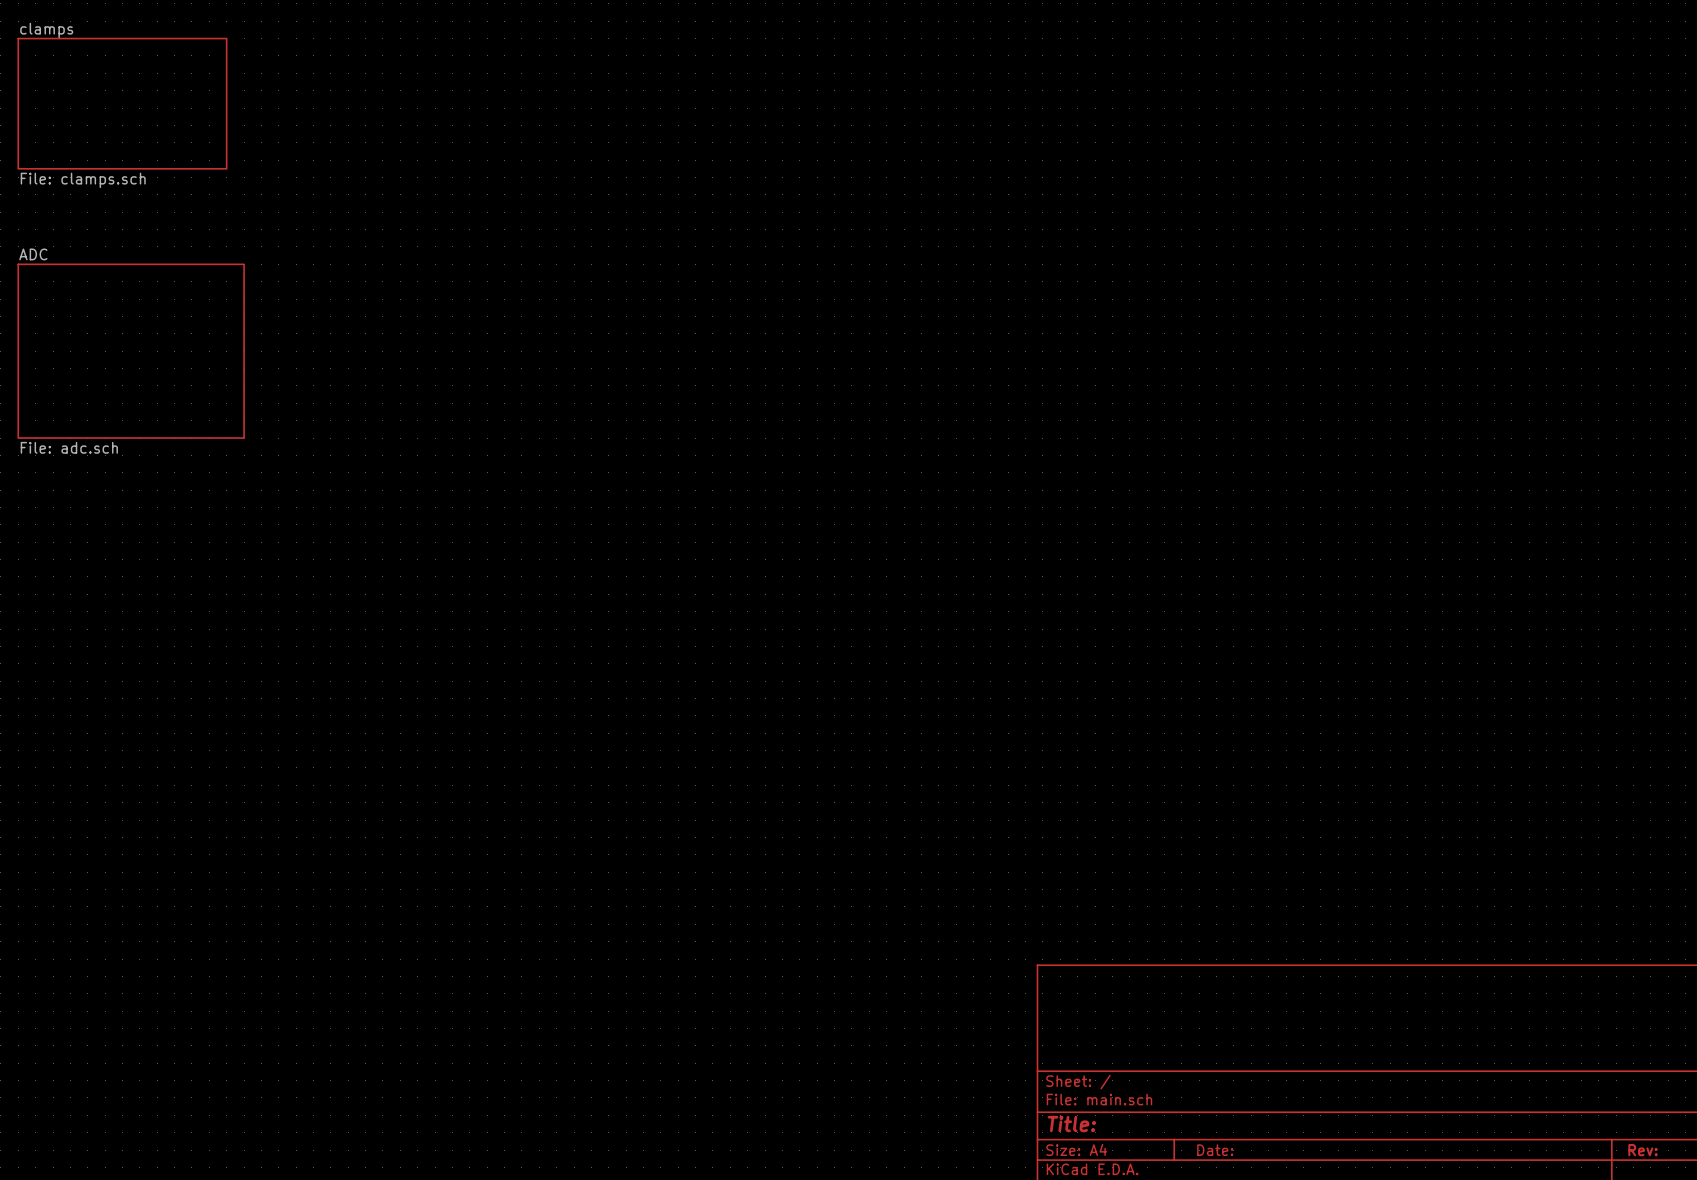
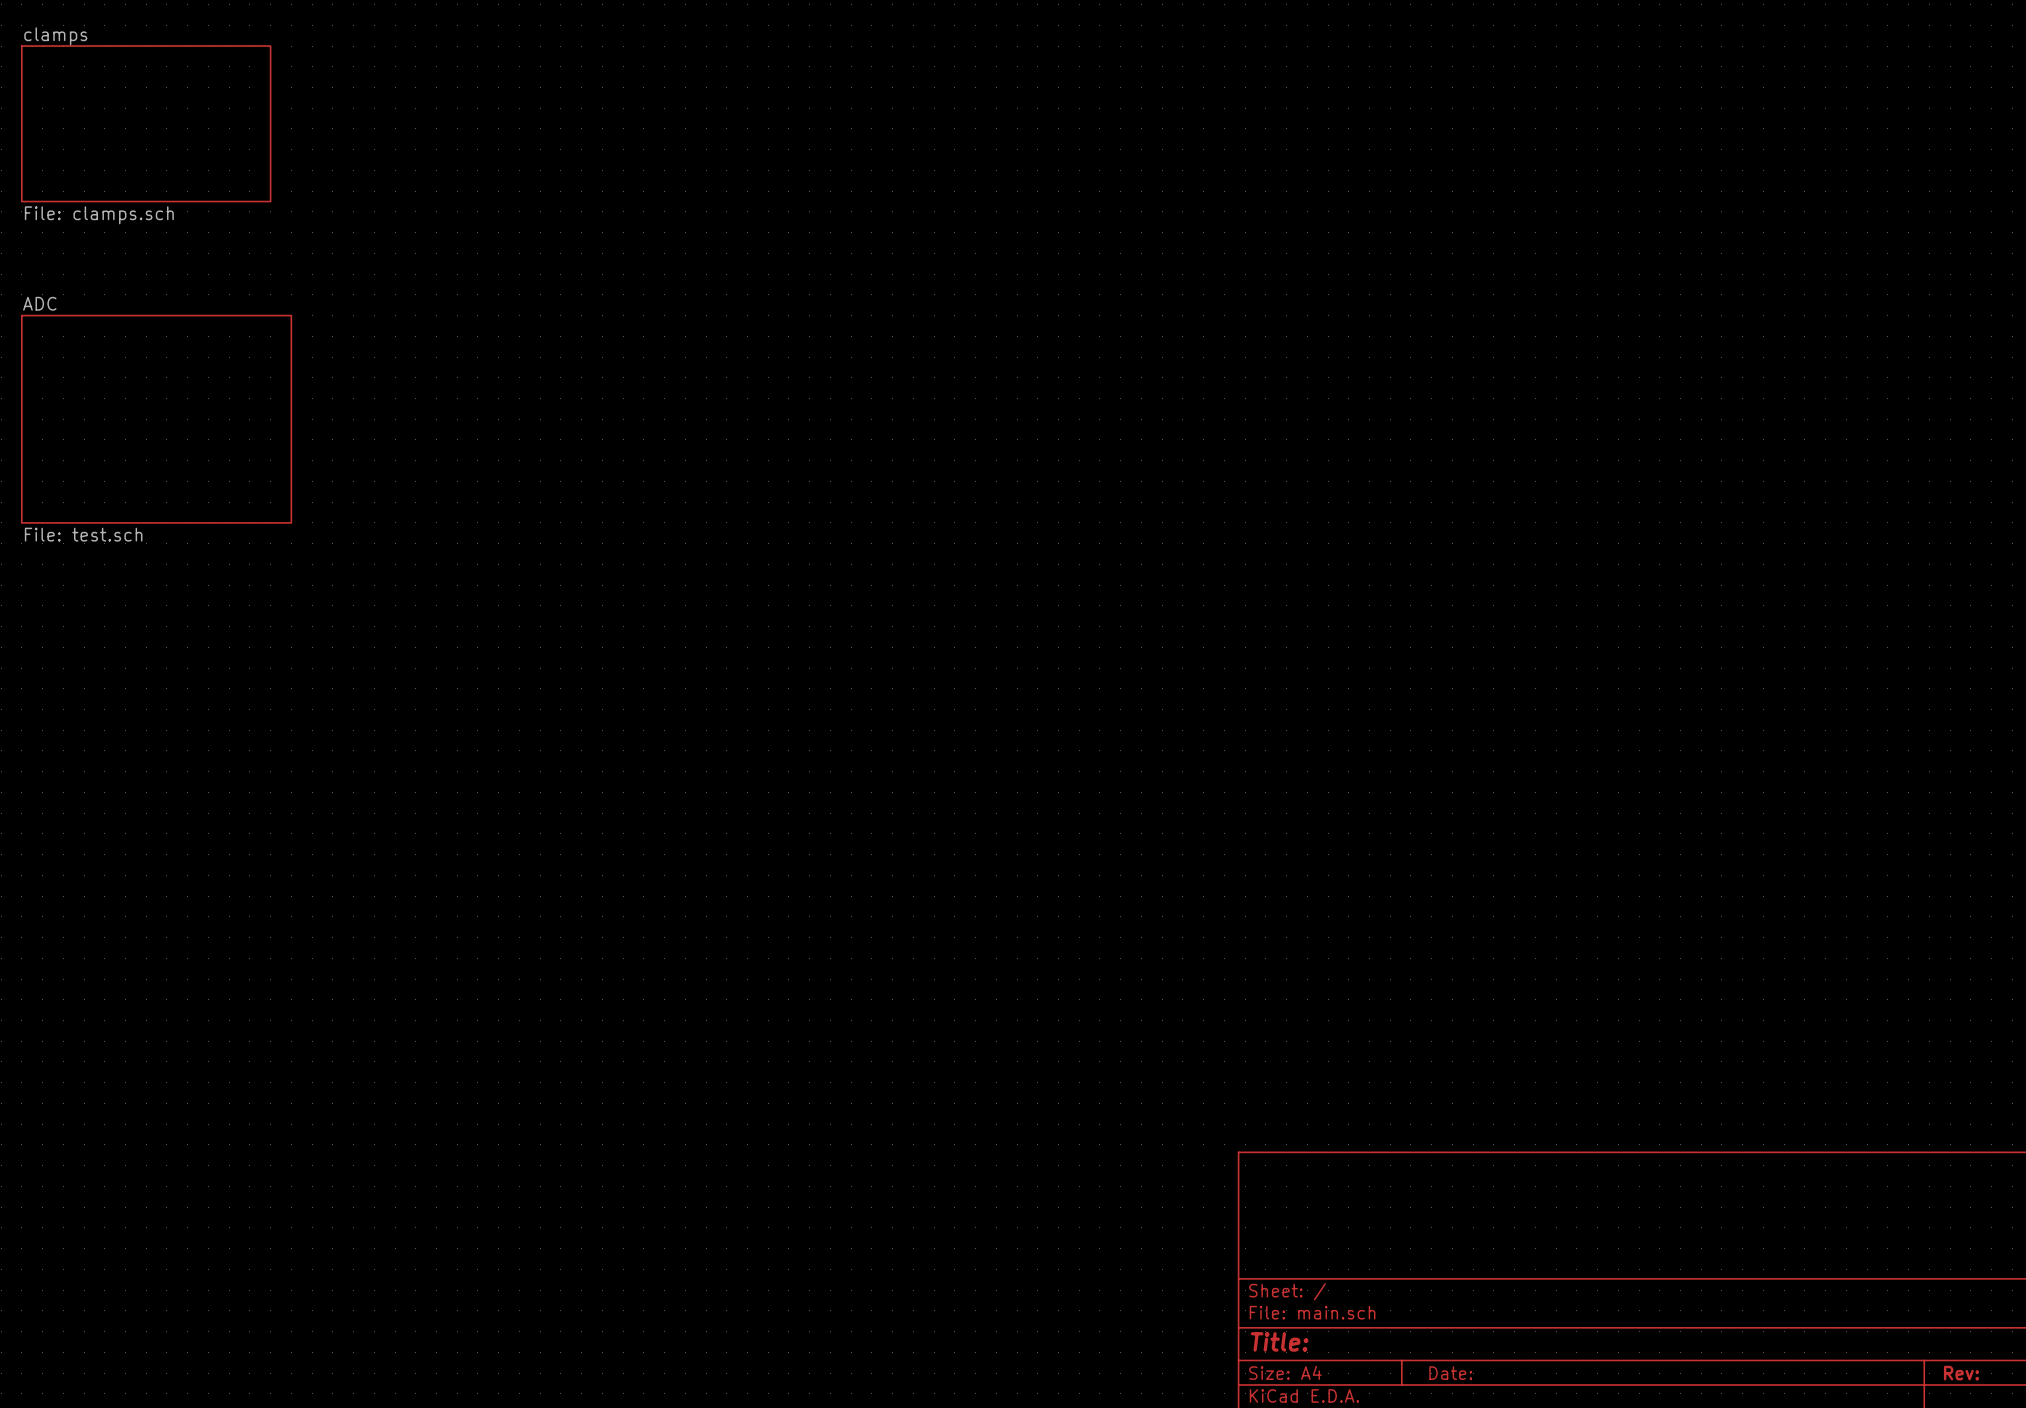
sheet ADC value: File: adc.sch (69, 447) -> File: test.sch (83, 534)

